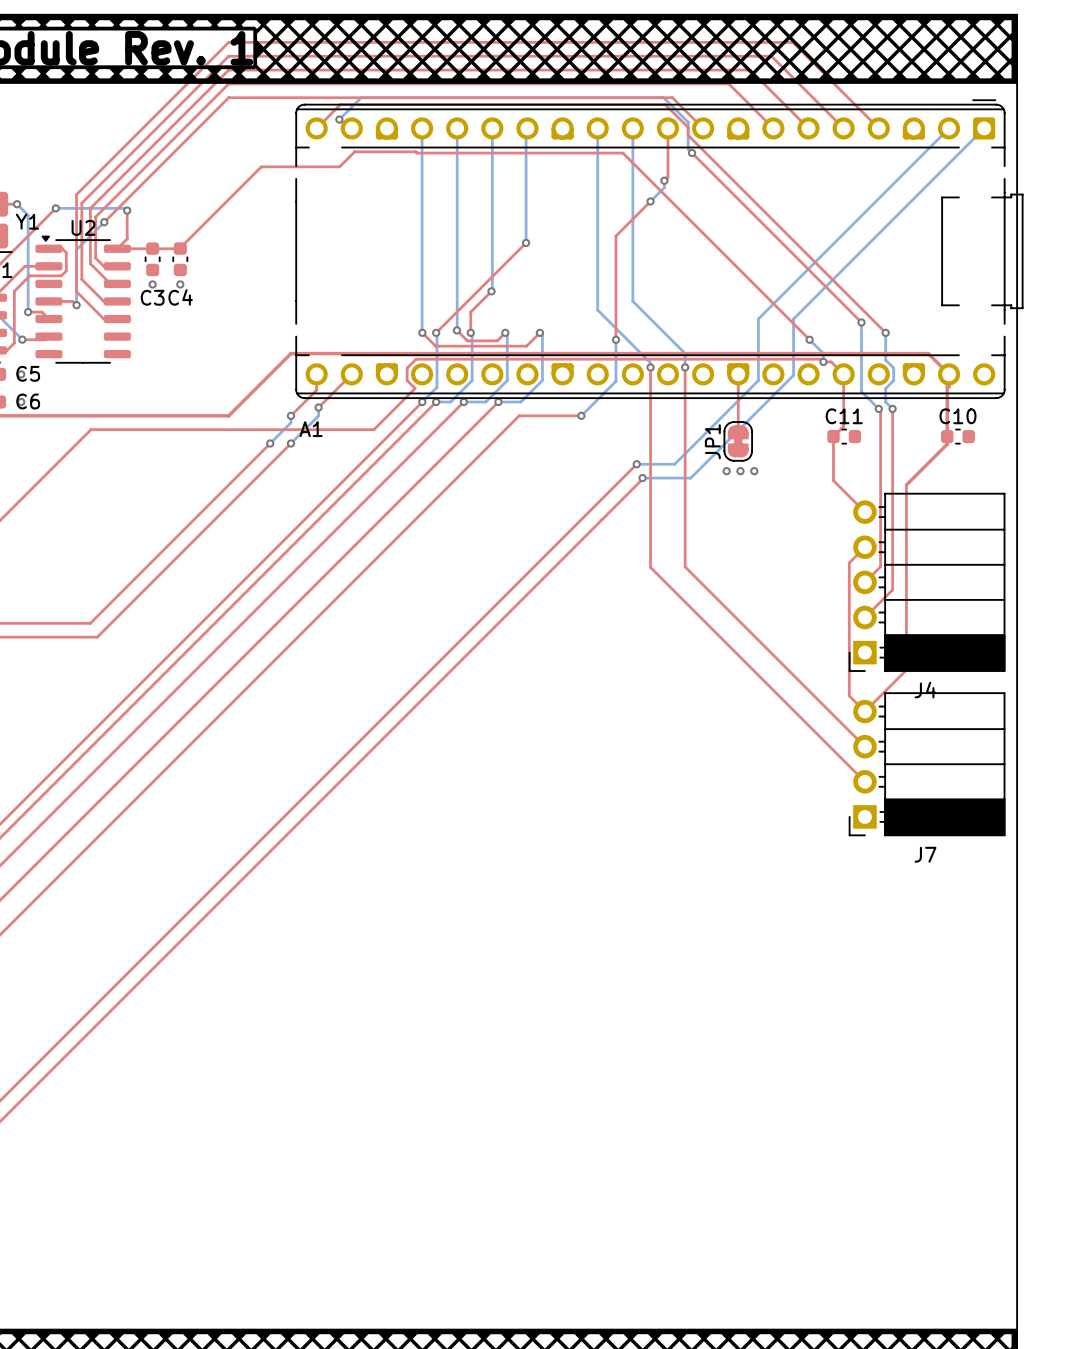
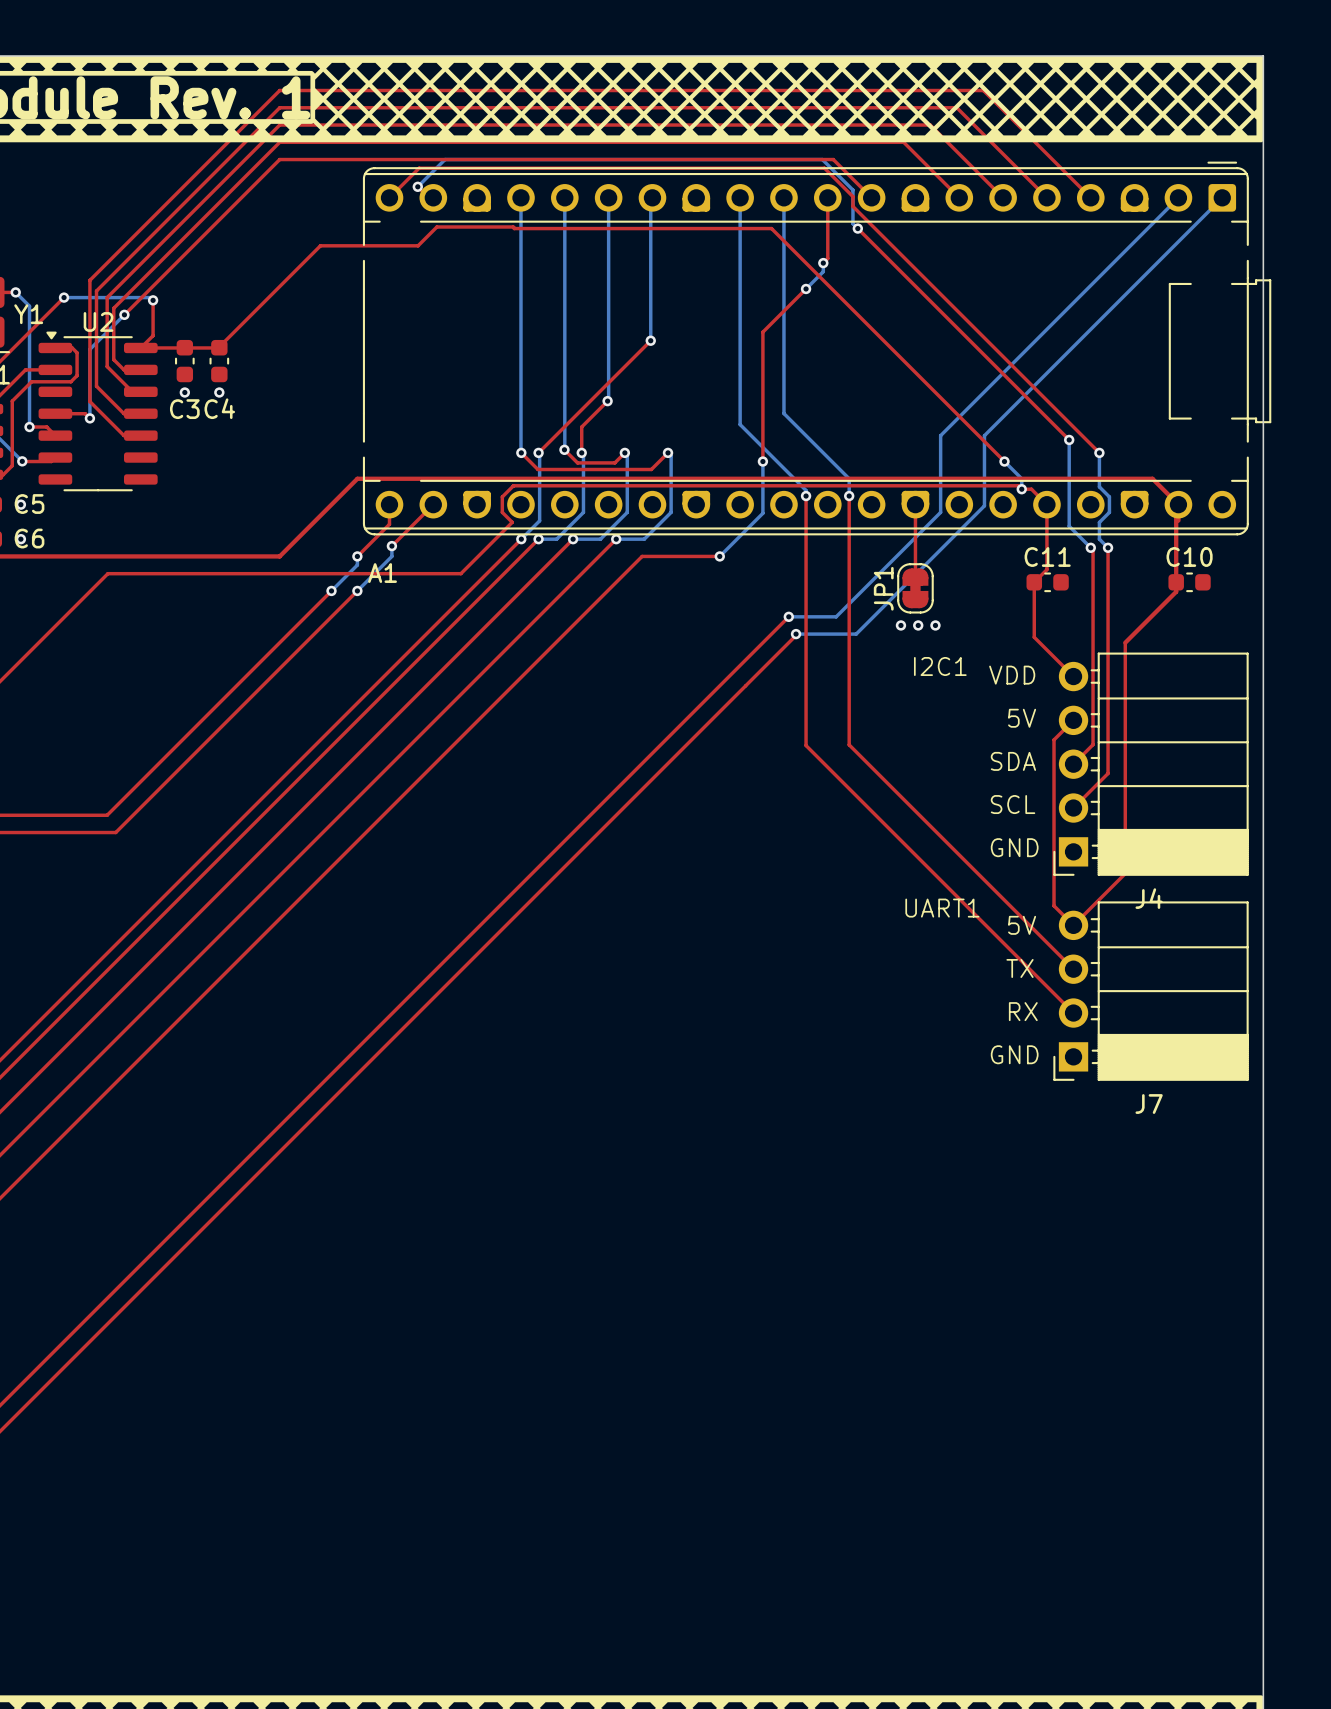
text: none -> I2C1 (940, 666)
text: none -> VDD (1012, 675)
text: none -> 5V (1022, 718)
text: none -> SDA (1013, 761)
text: none -> SCL (1013, 804)
text: none -> GND (1014, 847)
text: none -> UART1 (942, 908)
text: none -> 5V (1022, 925)
text: none -> TX (1020, 968)
text: none -> RX (1023, 1011)
text: none -> GND (1014, 1054)

